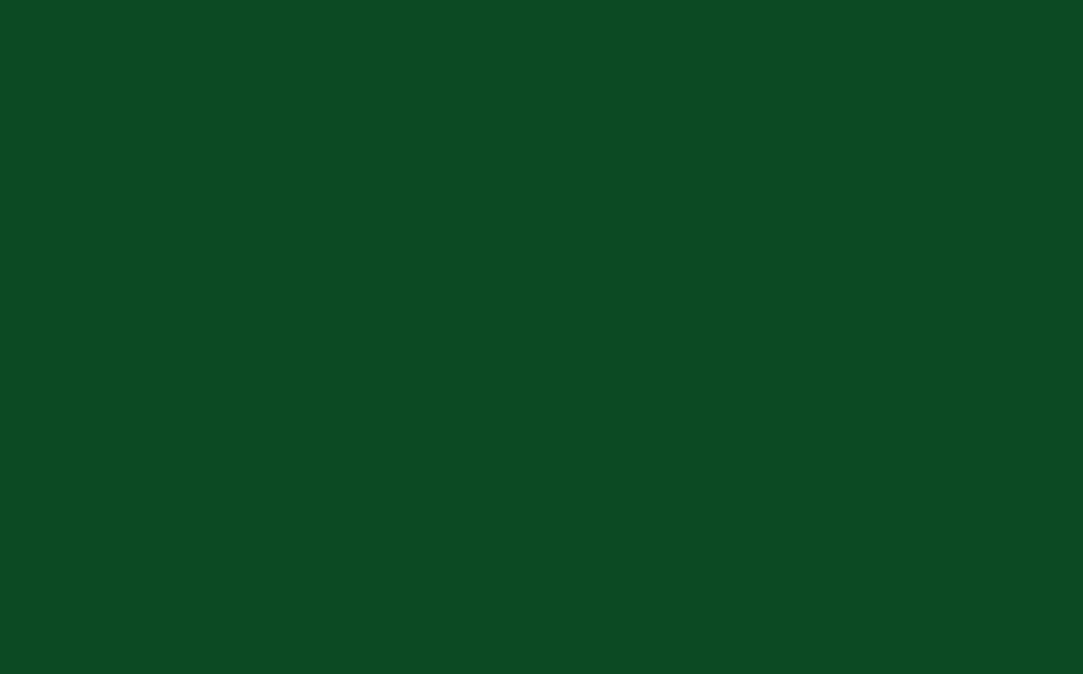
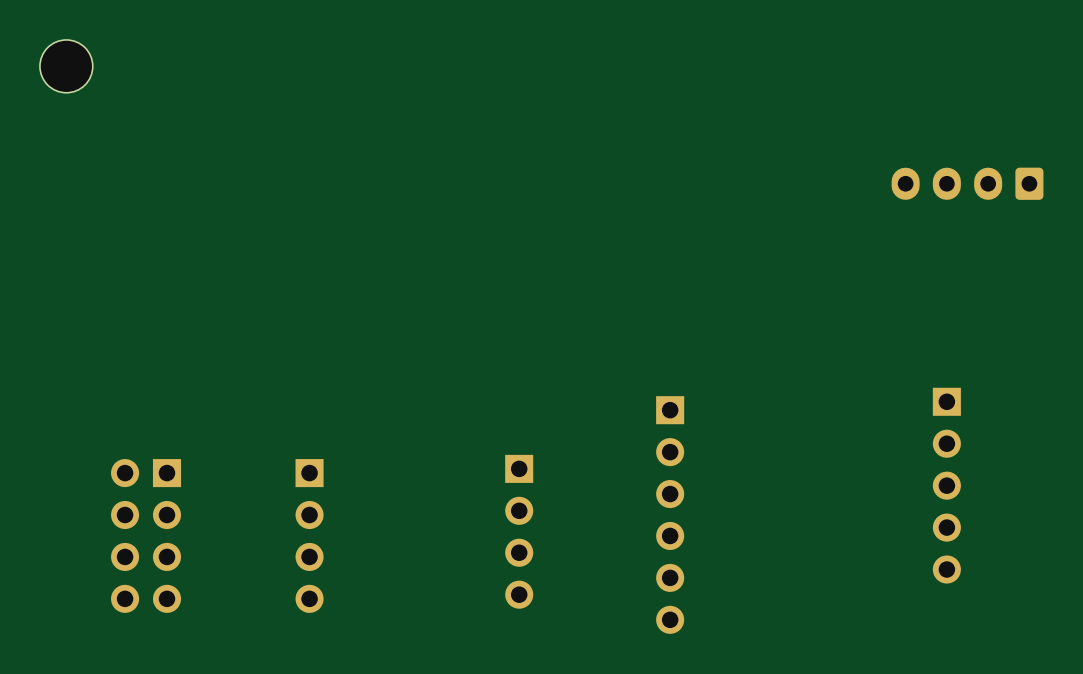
part: none -> (66, 66)
part: none -> (967, 183)
part: none -> (946, 485)
part: none -> (670, 515)
part: none -> (519, 531)
part: none -> (146, 535)
part: none -> (309, 535)

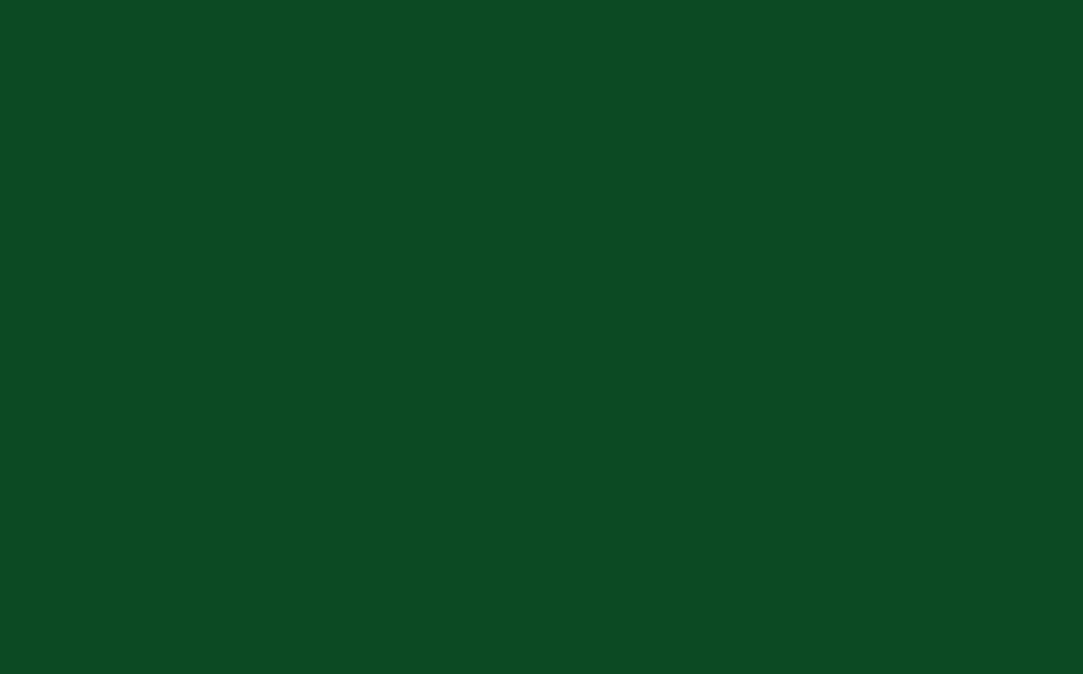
part: (66, 66) -> none
part: (967, 183) -> none
part: (946, 485) -> none
part: (670, 515) -> none
part: (519, 531) -> none
part: (146, 535) -> none
part: (309, 535) -> none

